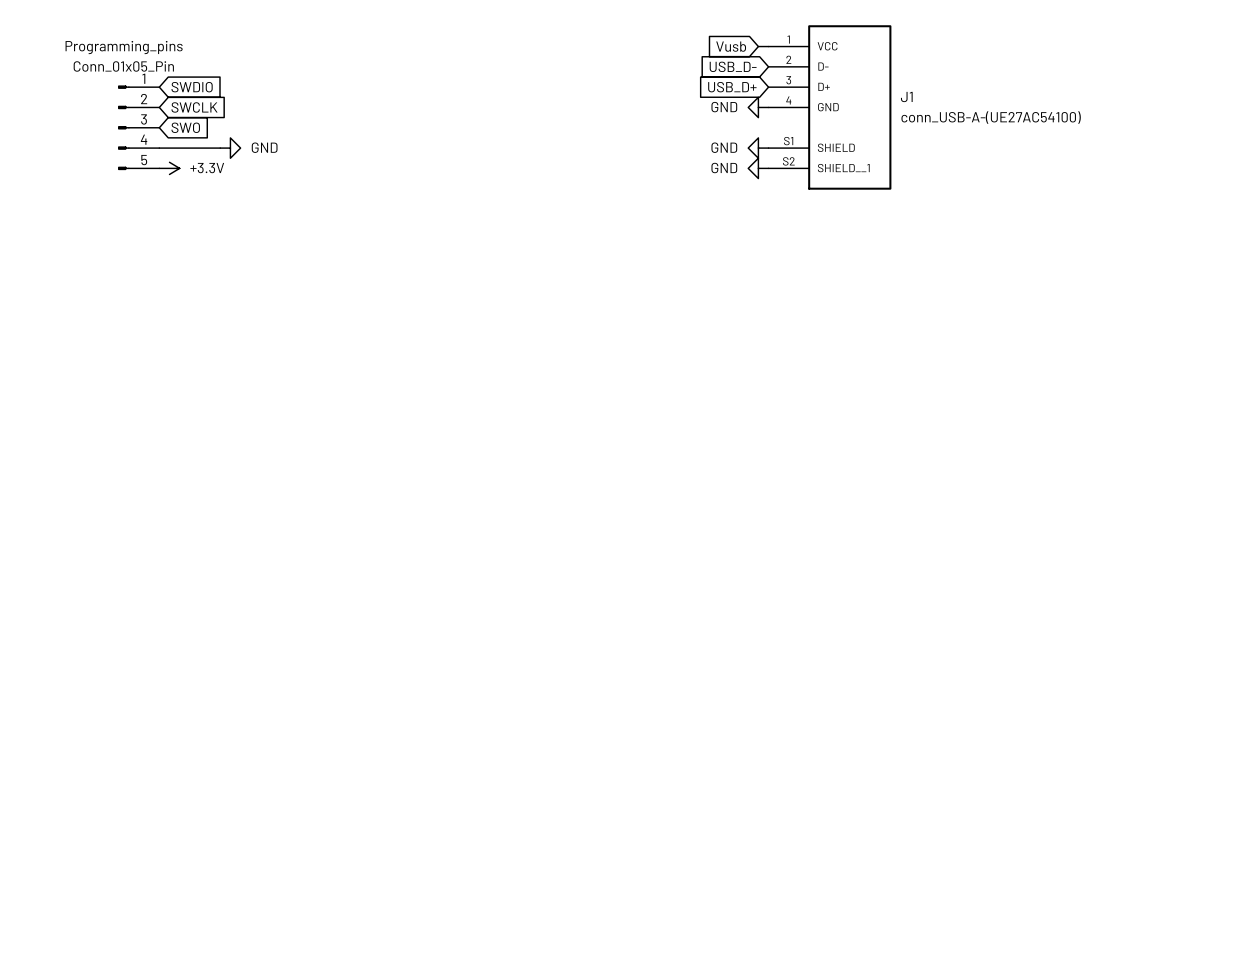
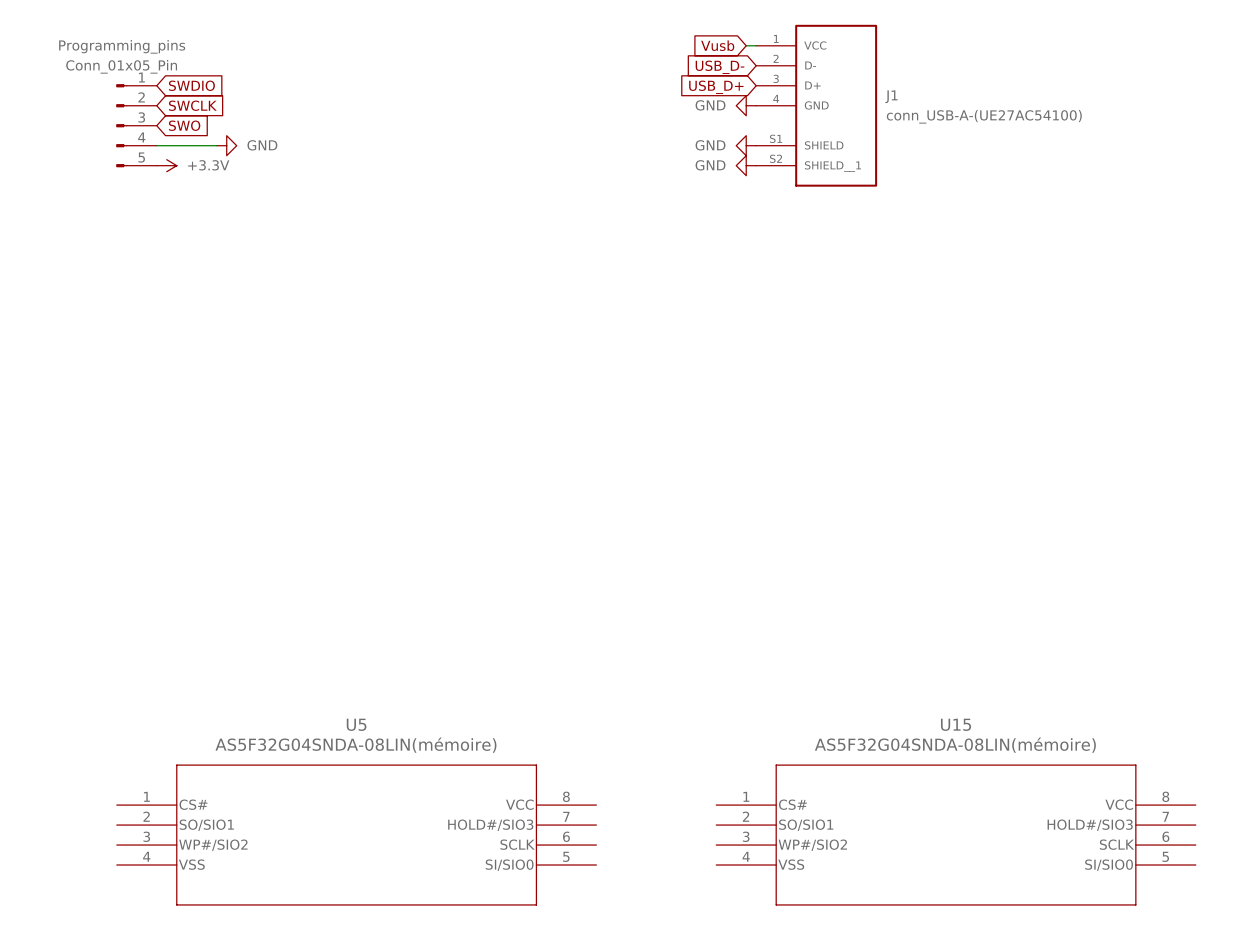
U5: none -> AS5F32G04SNDA-08LIN(mémoire) (356, 835)
U15: none -> AS5F32G04SNDA-08LIN(mémoire) (956, 835)

